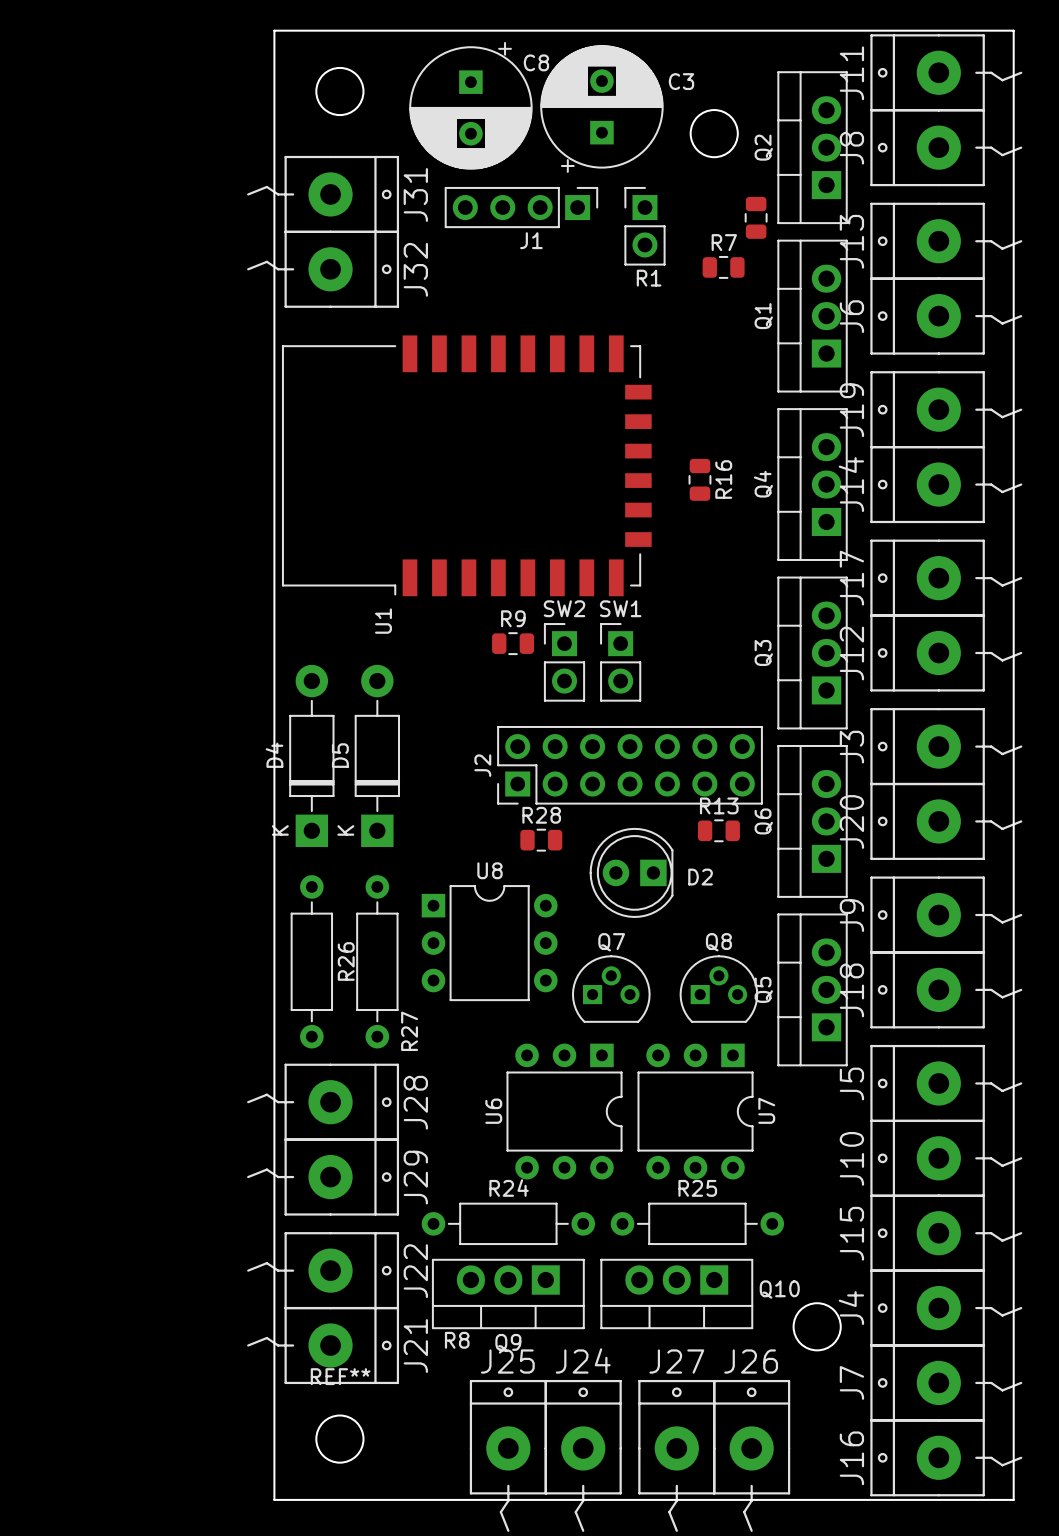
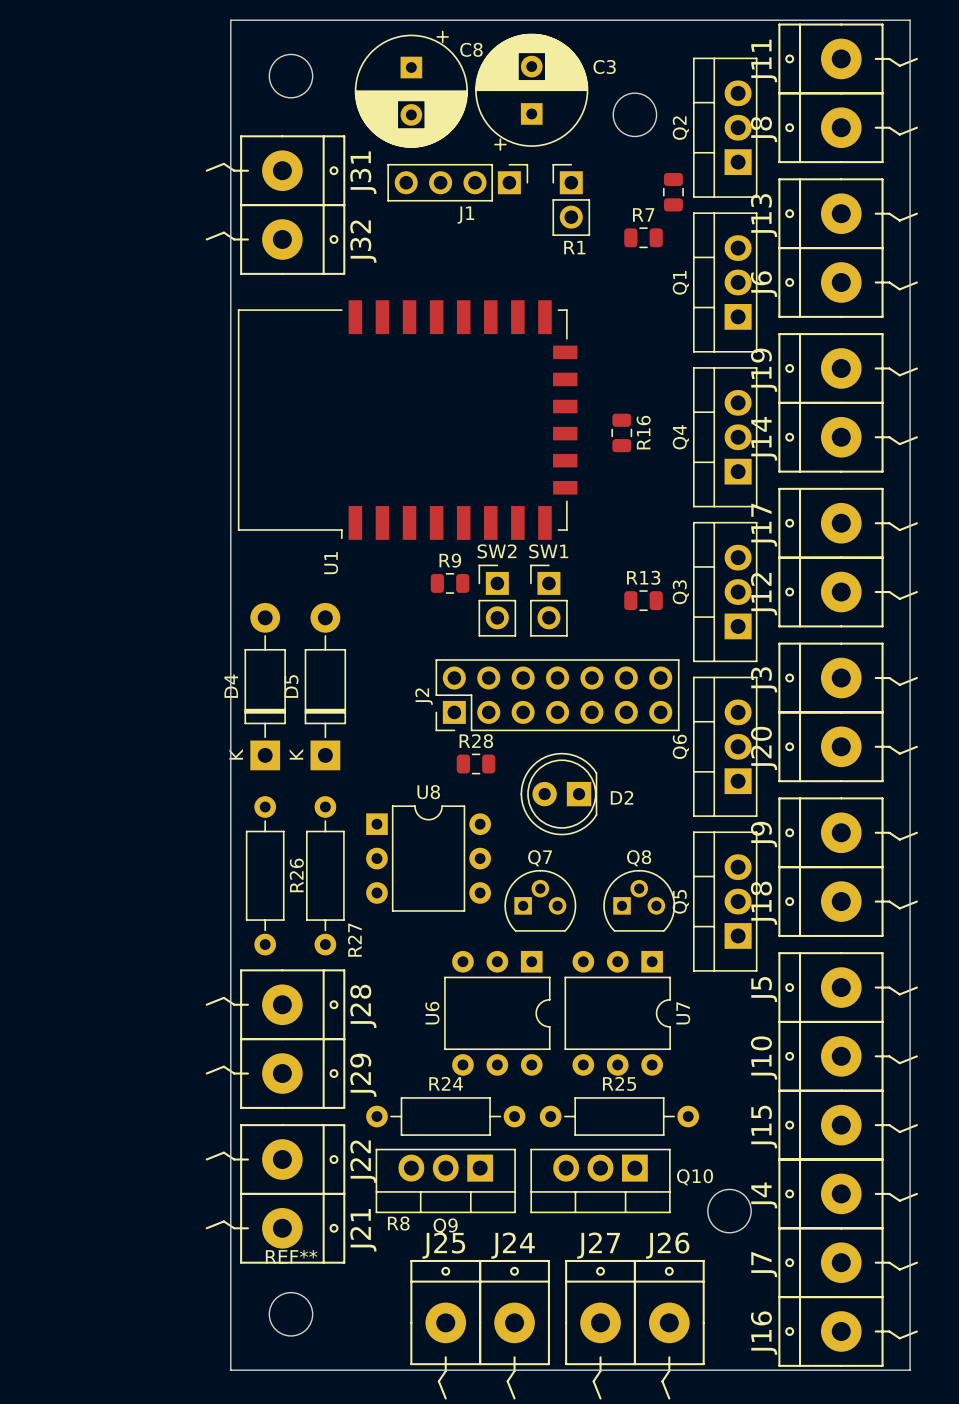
R13 position: (718, 830) -> (643, 600)

